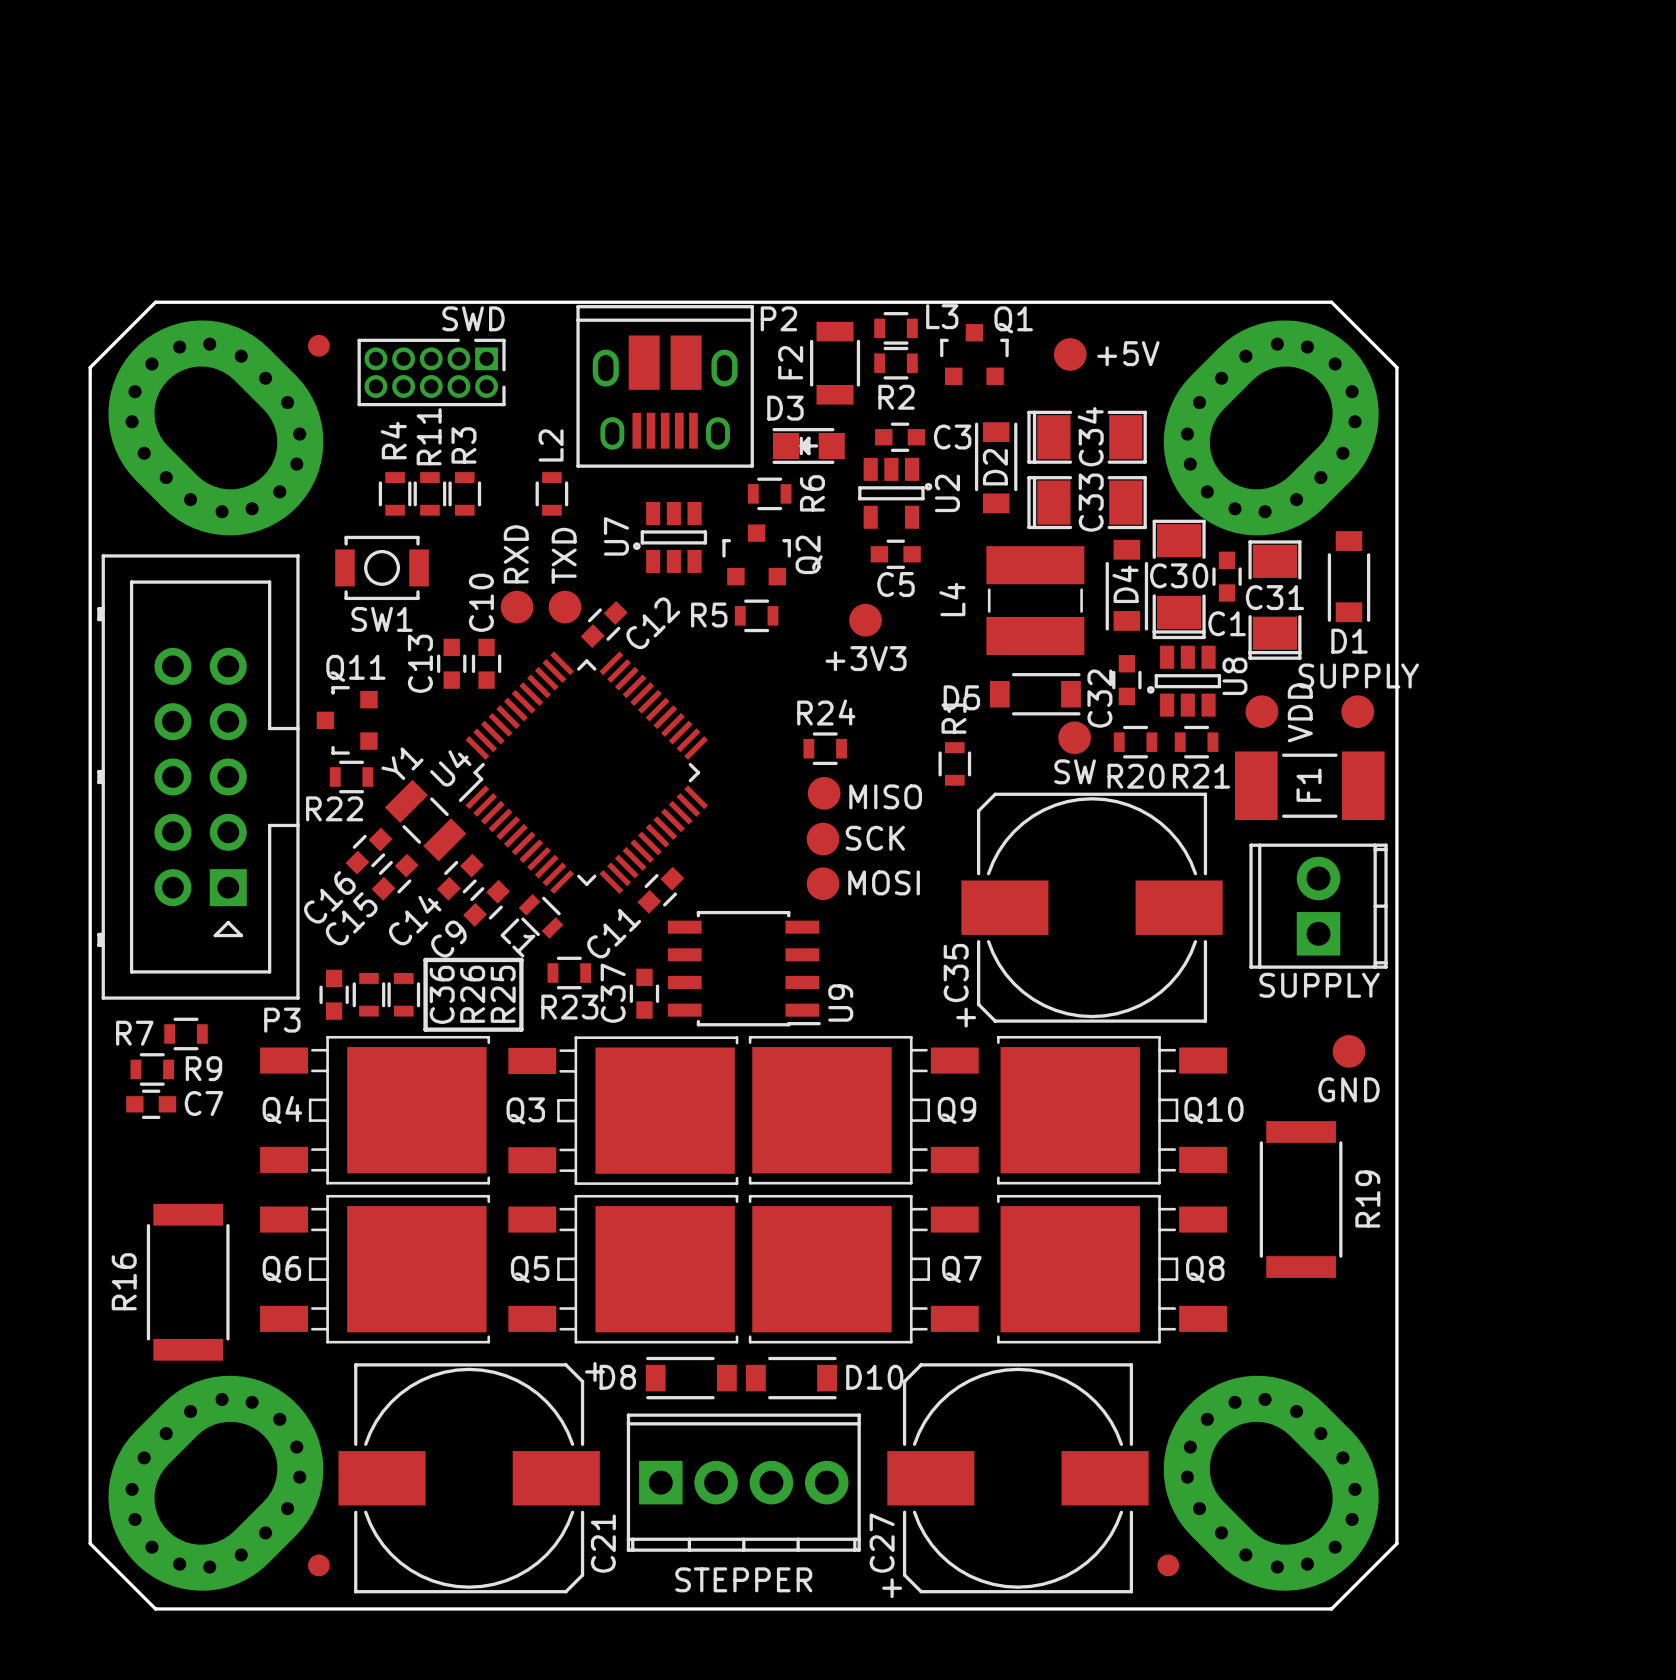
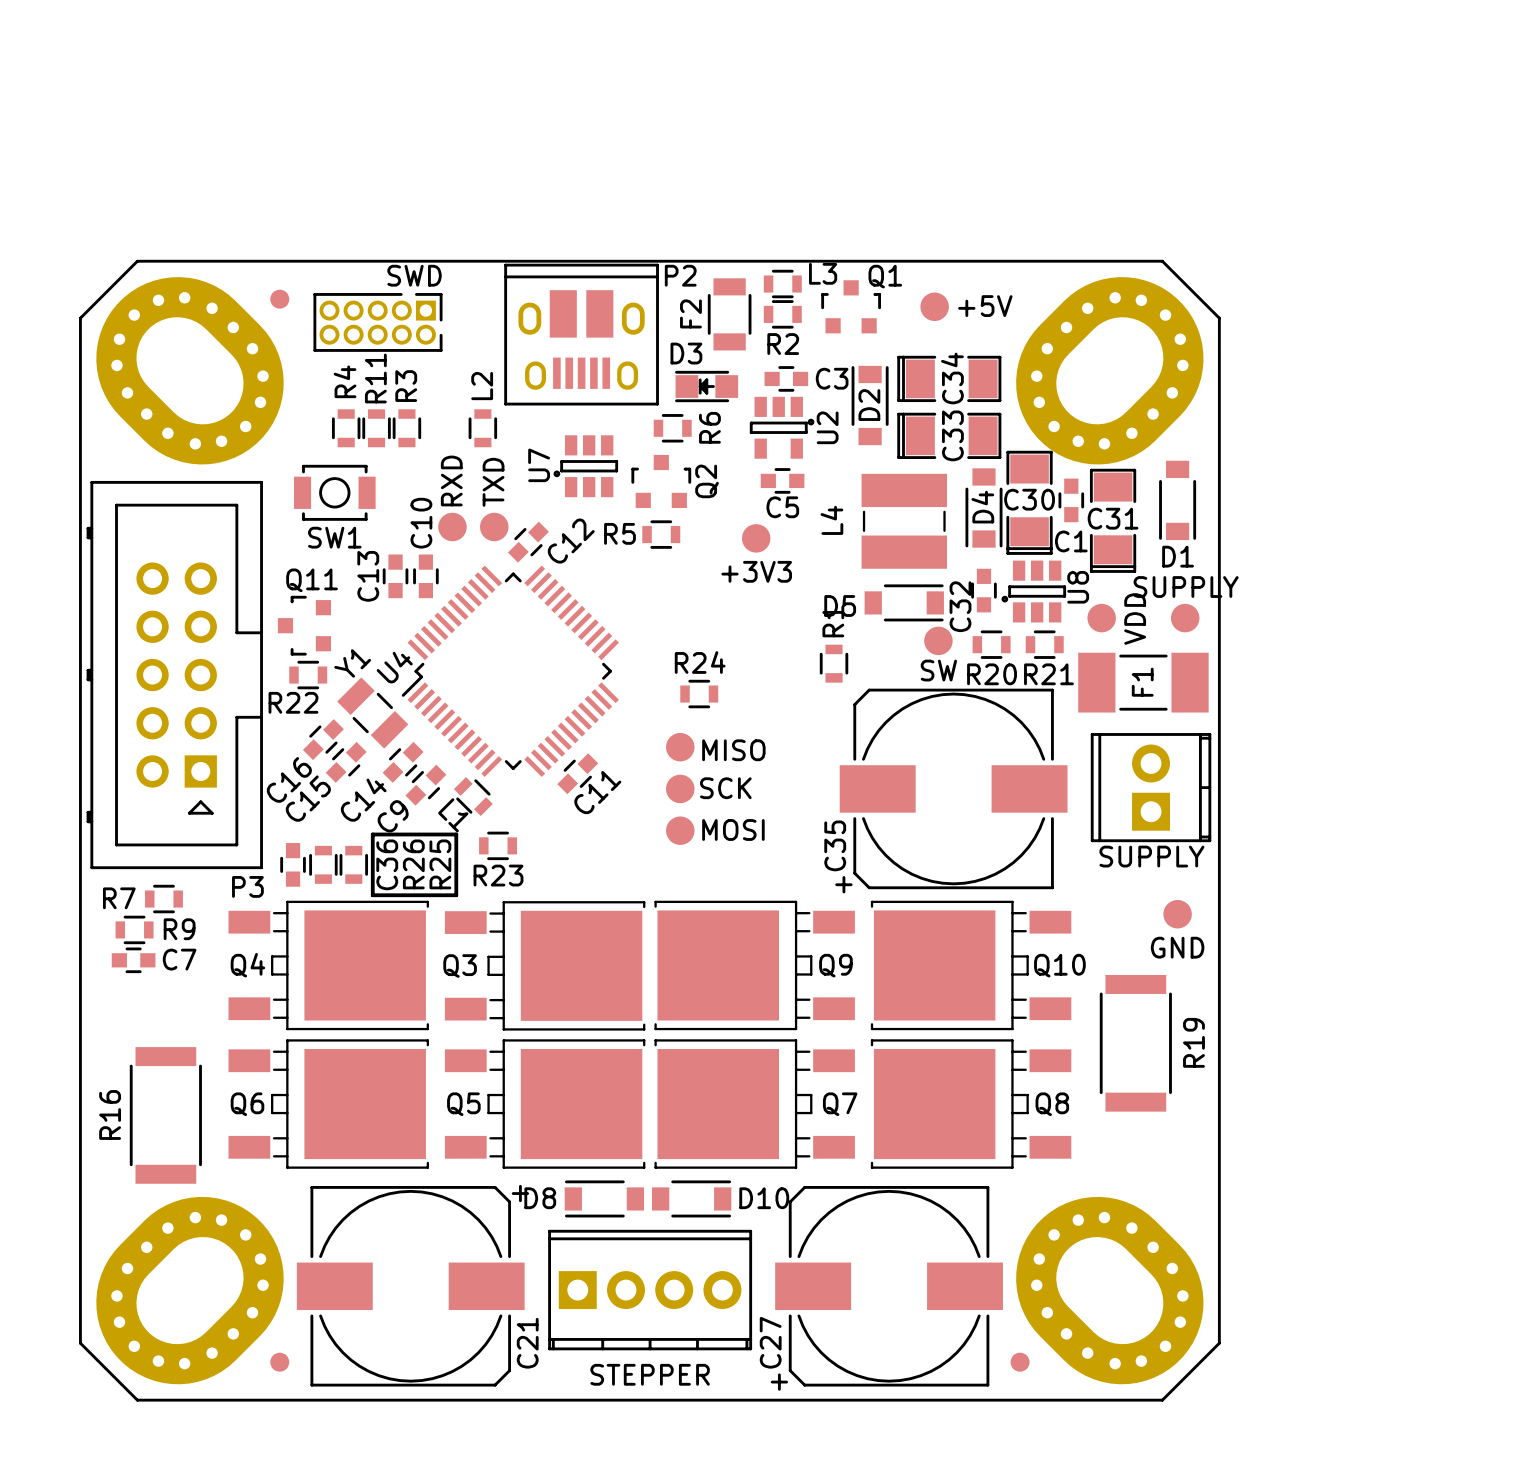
R24 position: (825, 748) -> (699, 694)
part position: (824, 793) -> (680, 747)
part position: (823, 839) -> (680, 788)
part position: (823, 883) -> (680, 830)
C11 name position: C11 (614, 933) -> C11 (597, 792)
U9: (744, 968) -> none
C37: (644, 993) -> none

